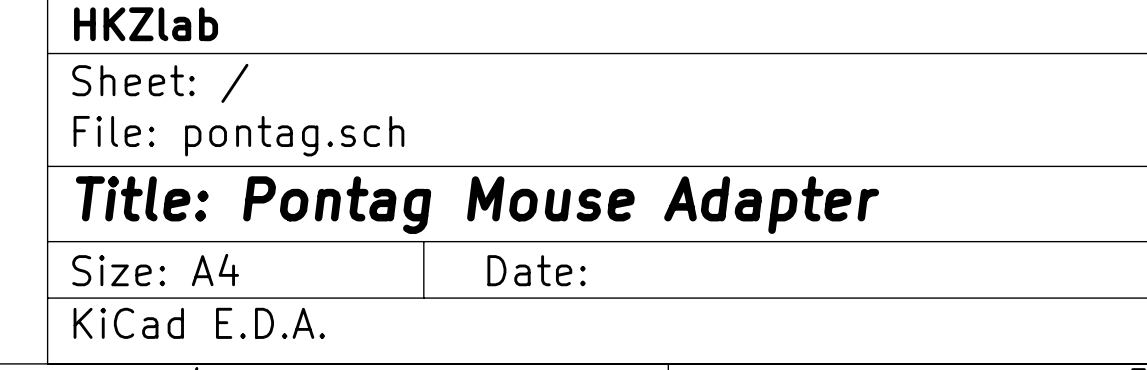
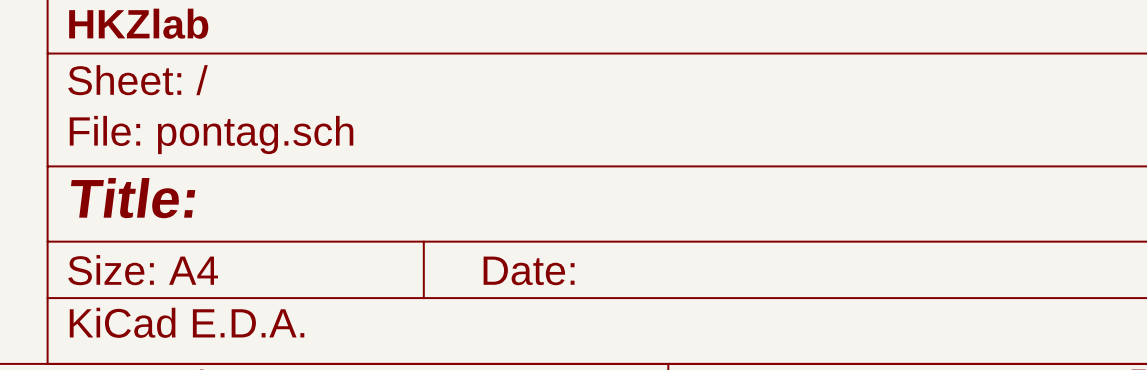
title block: Title: Pontag Mouse Adapter (477, 205) -> Title: (133, 198)

